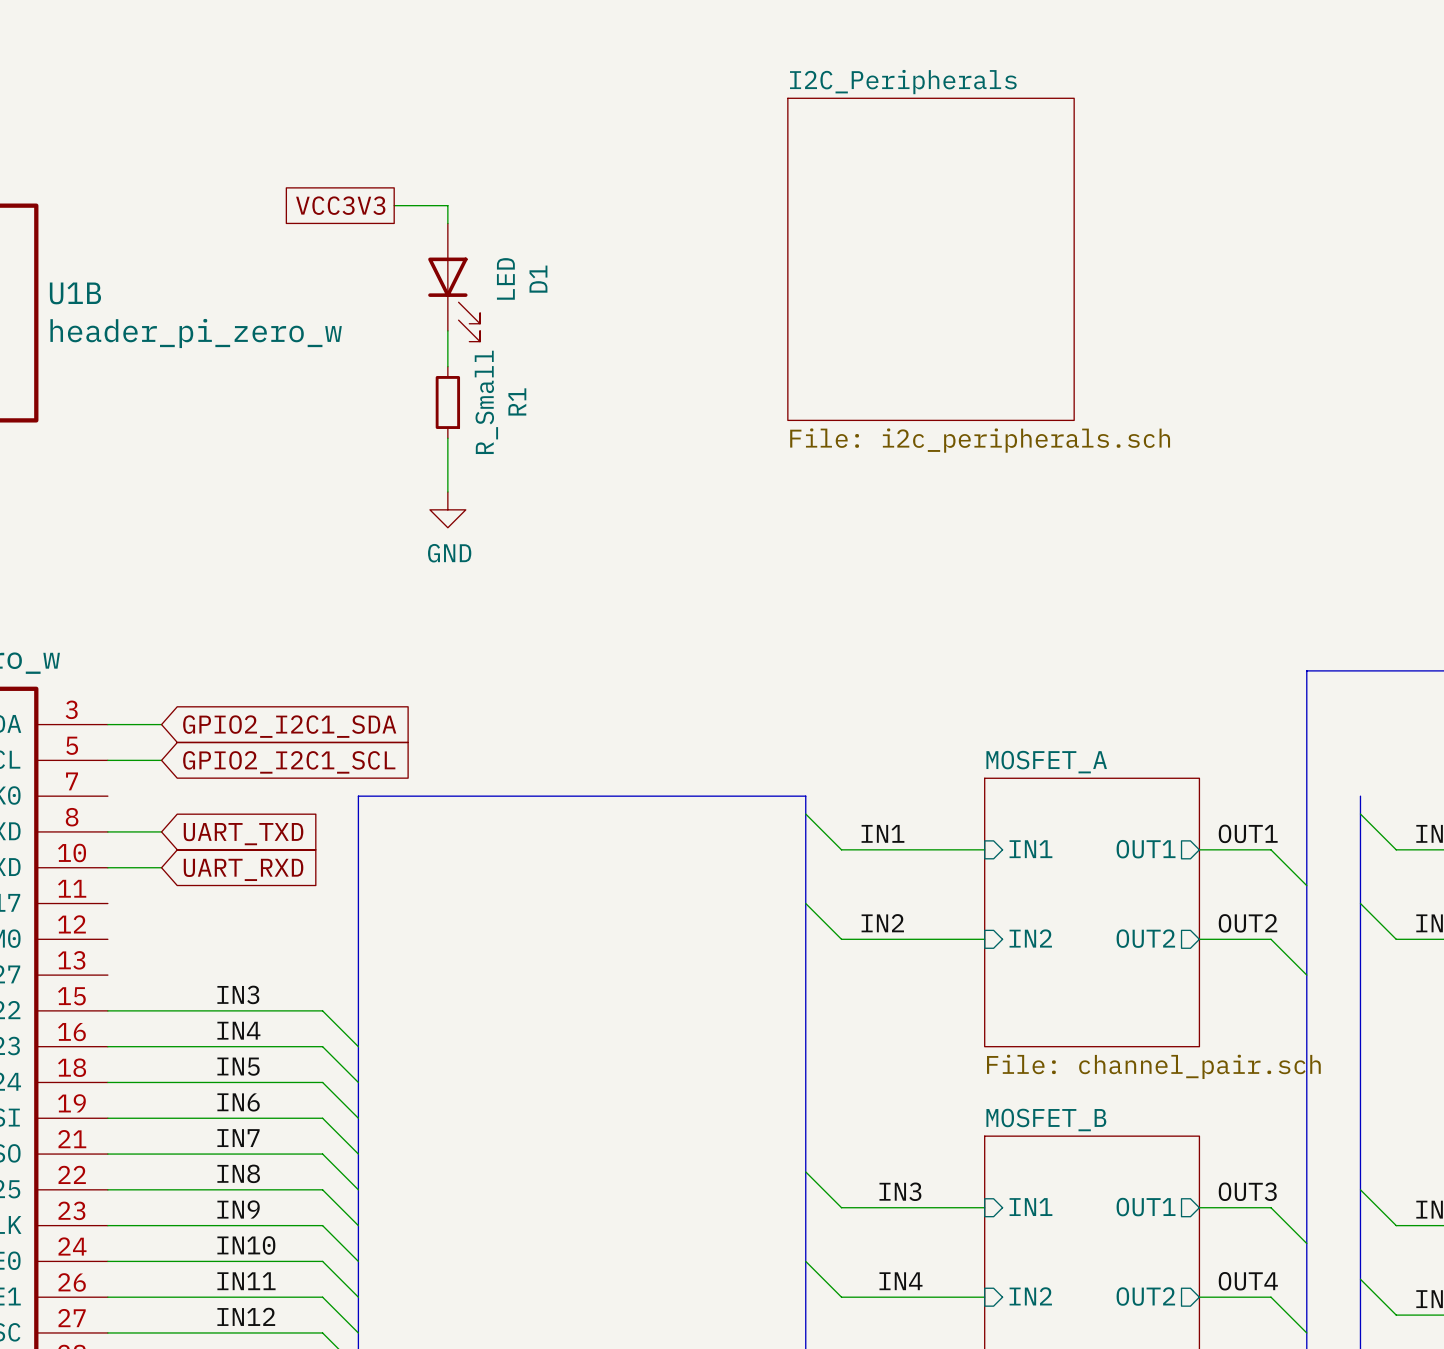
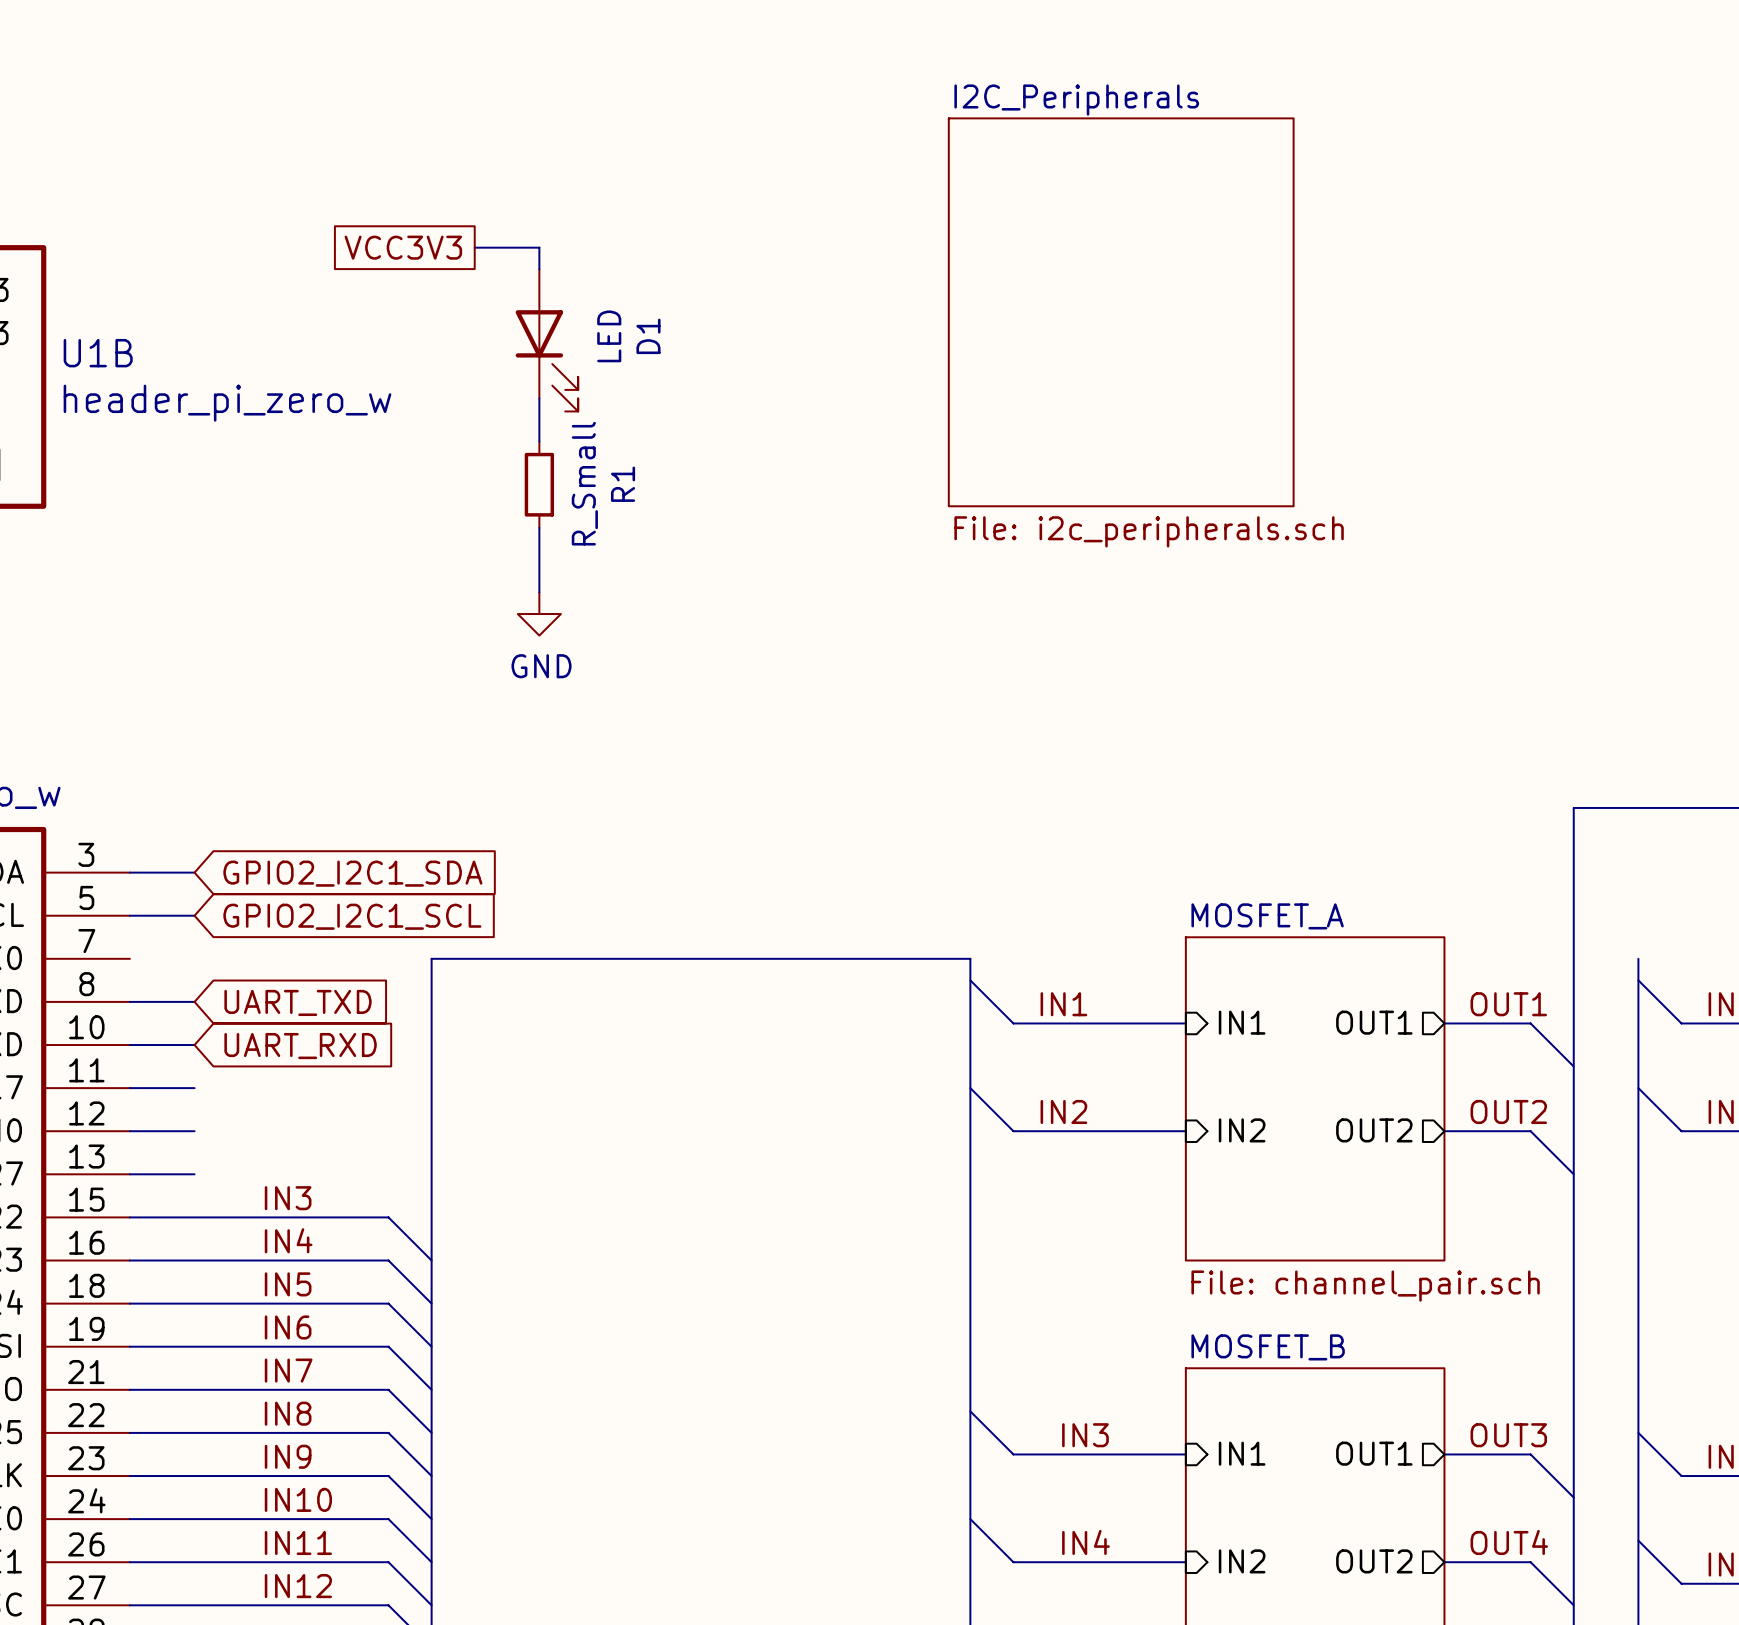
wire: none -> (129, 1088) (194, 1088)
wire: none -> (129, 1131) (194, 1131)
wire: none -> (129, 1174) (194, 1174)

